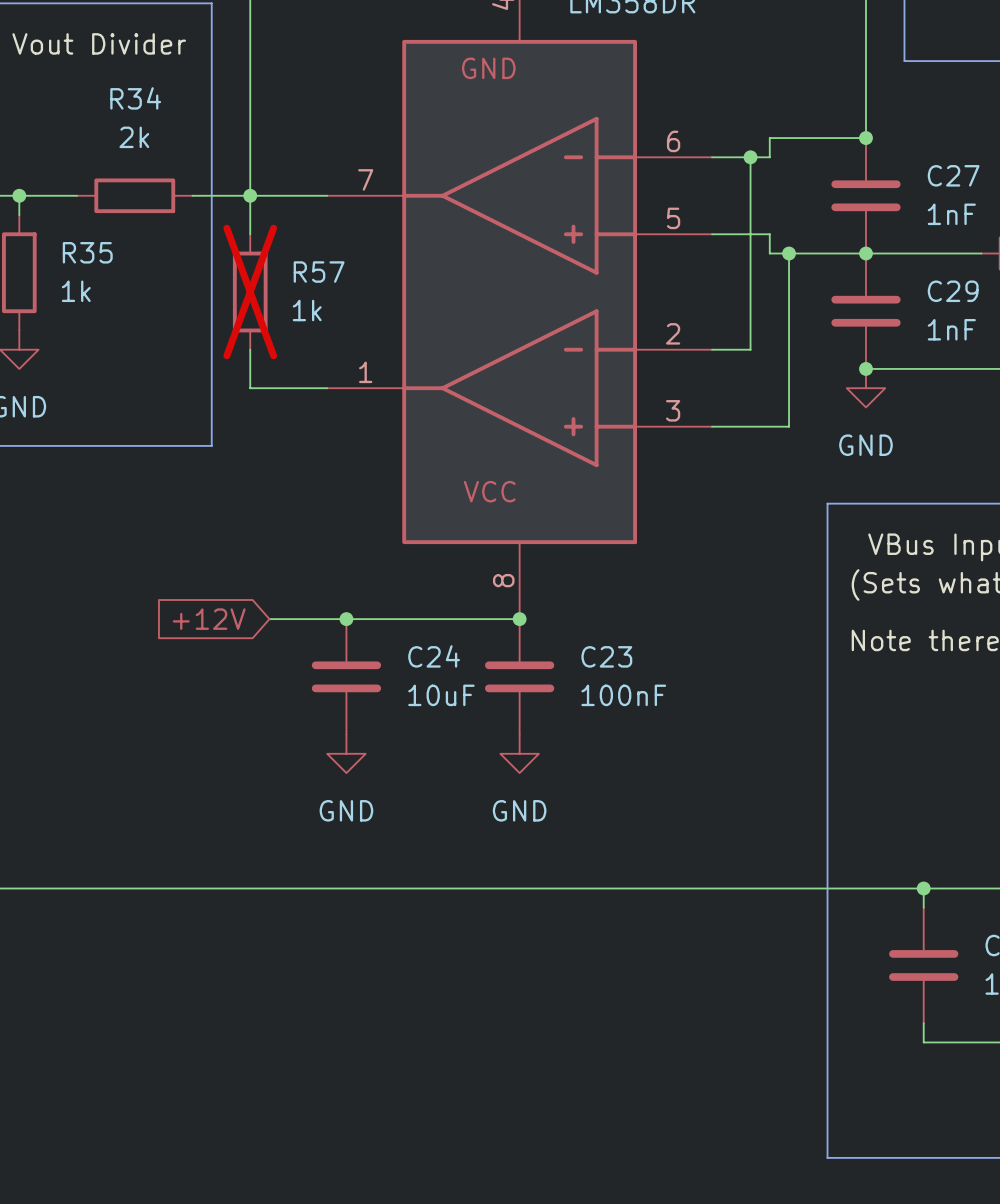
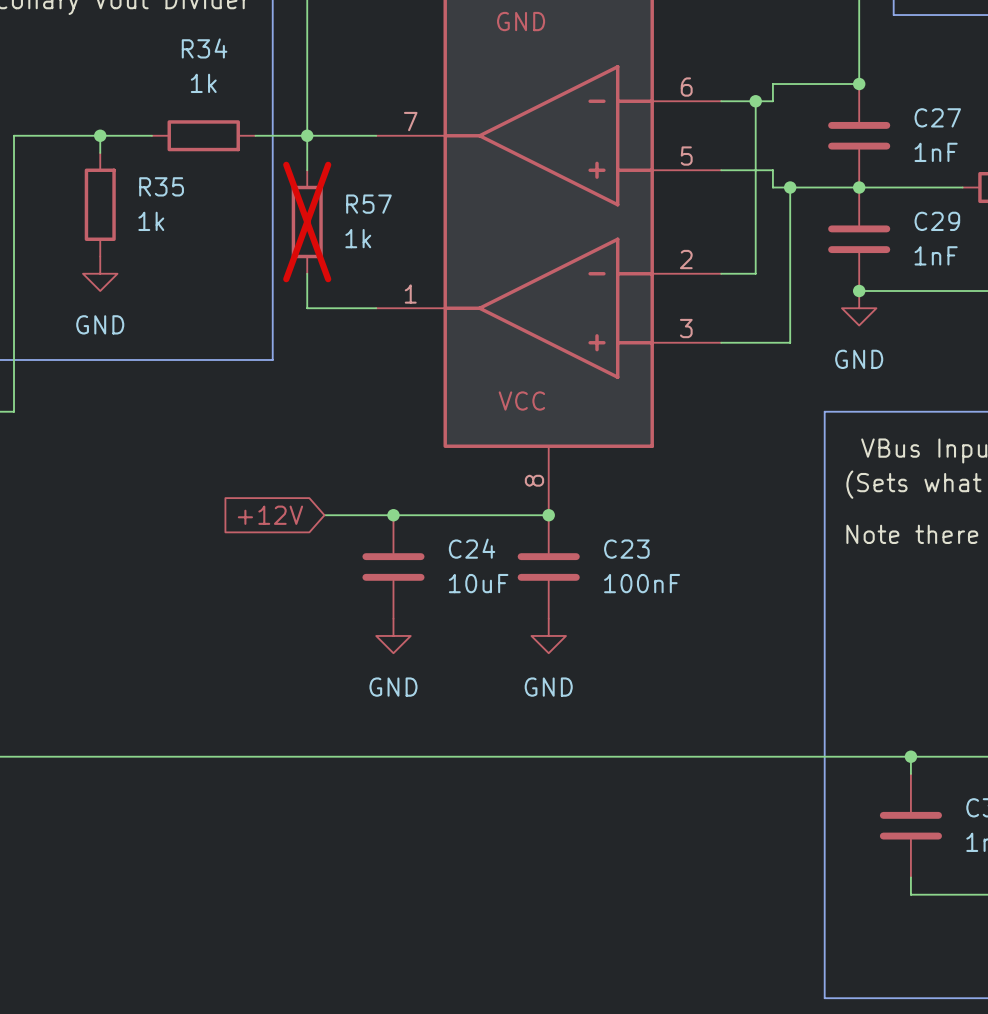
R34 value: 2k (134, 137) -> 1k (203, 83)

